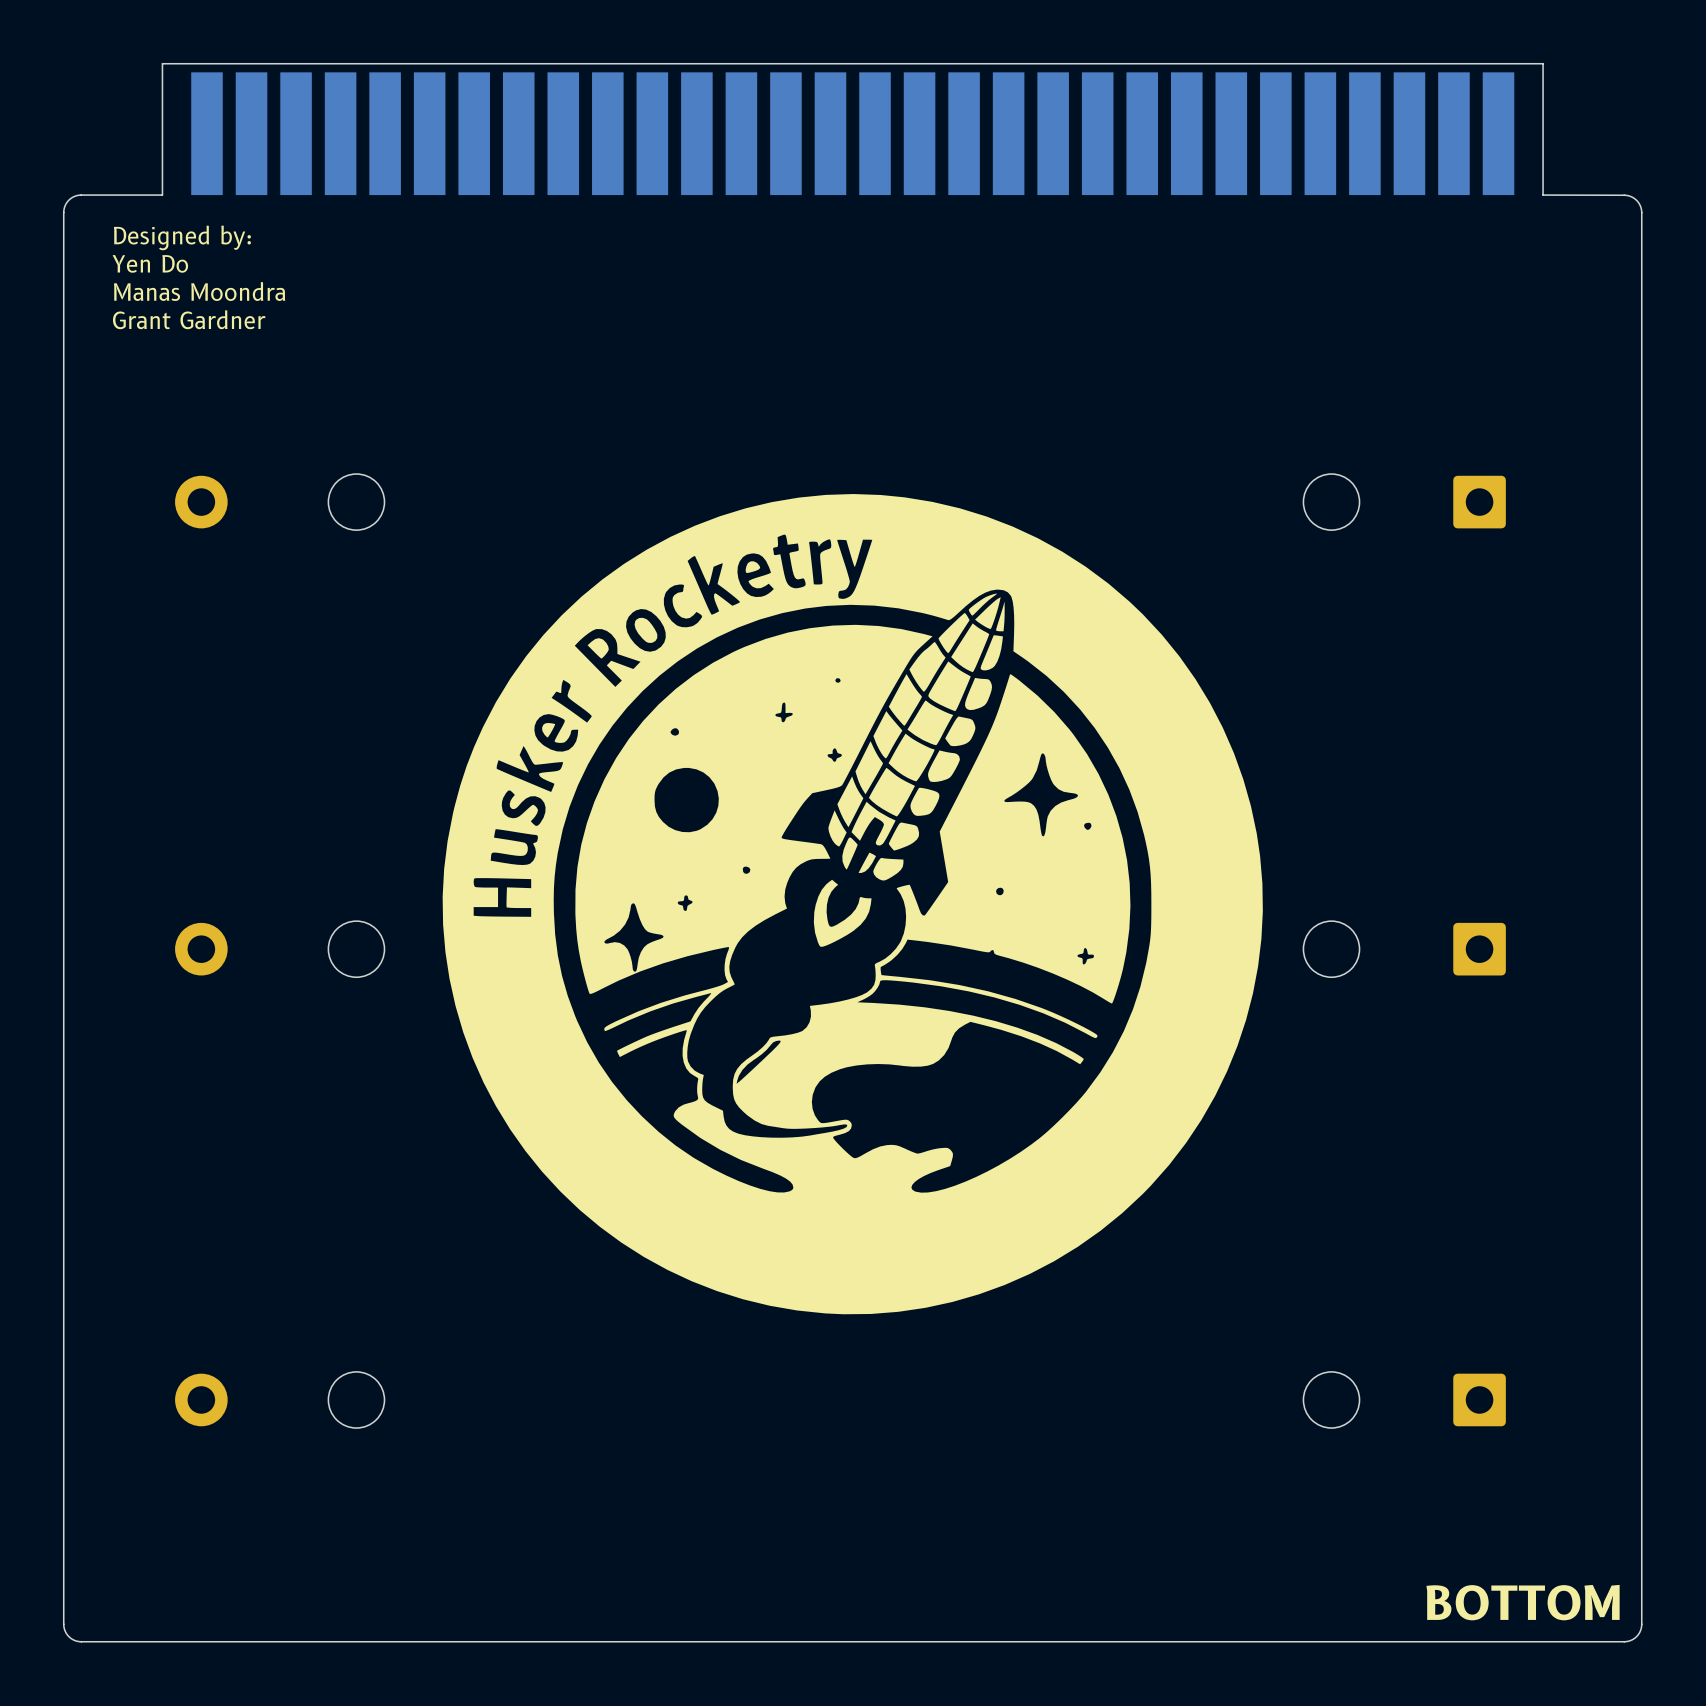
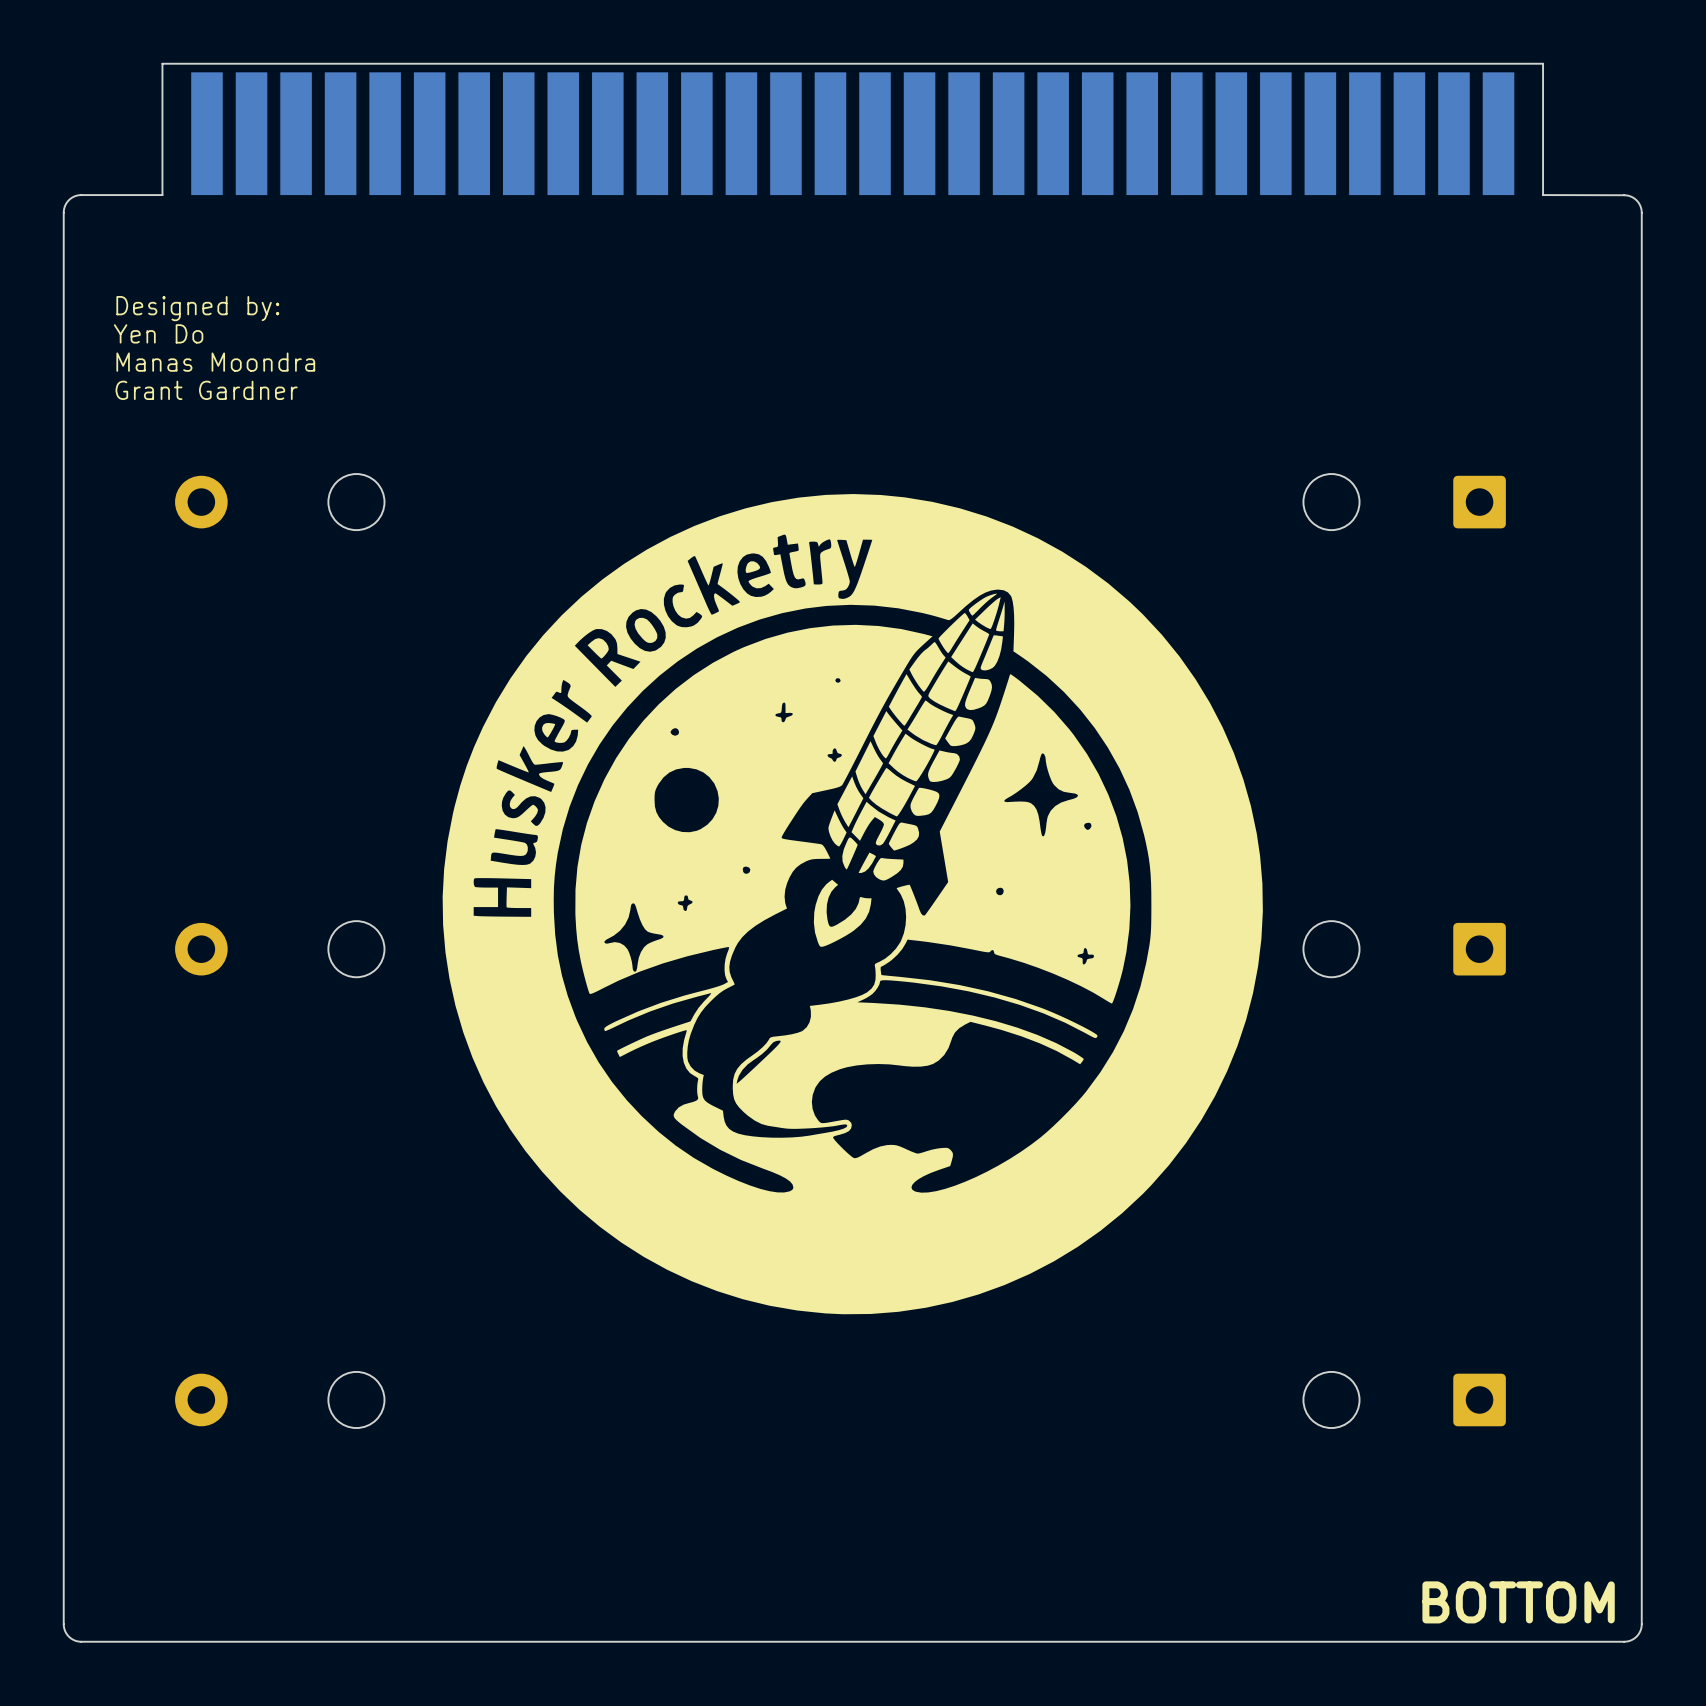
text position: Designed by: (182, 237) -> Designed by: (197, 308)
text position: Yen Do (150, 263) -> Yen Do (158, 333)
text position: Manas Moondra (199, 291) -> Manas Moondra (215, 362)
text position: Grant Gardner (189, 319) -> Grant Gardner (206, 390)

